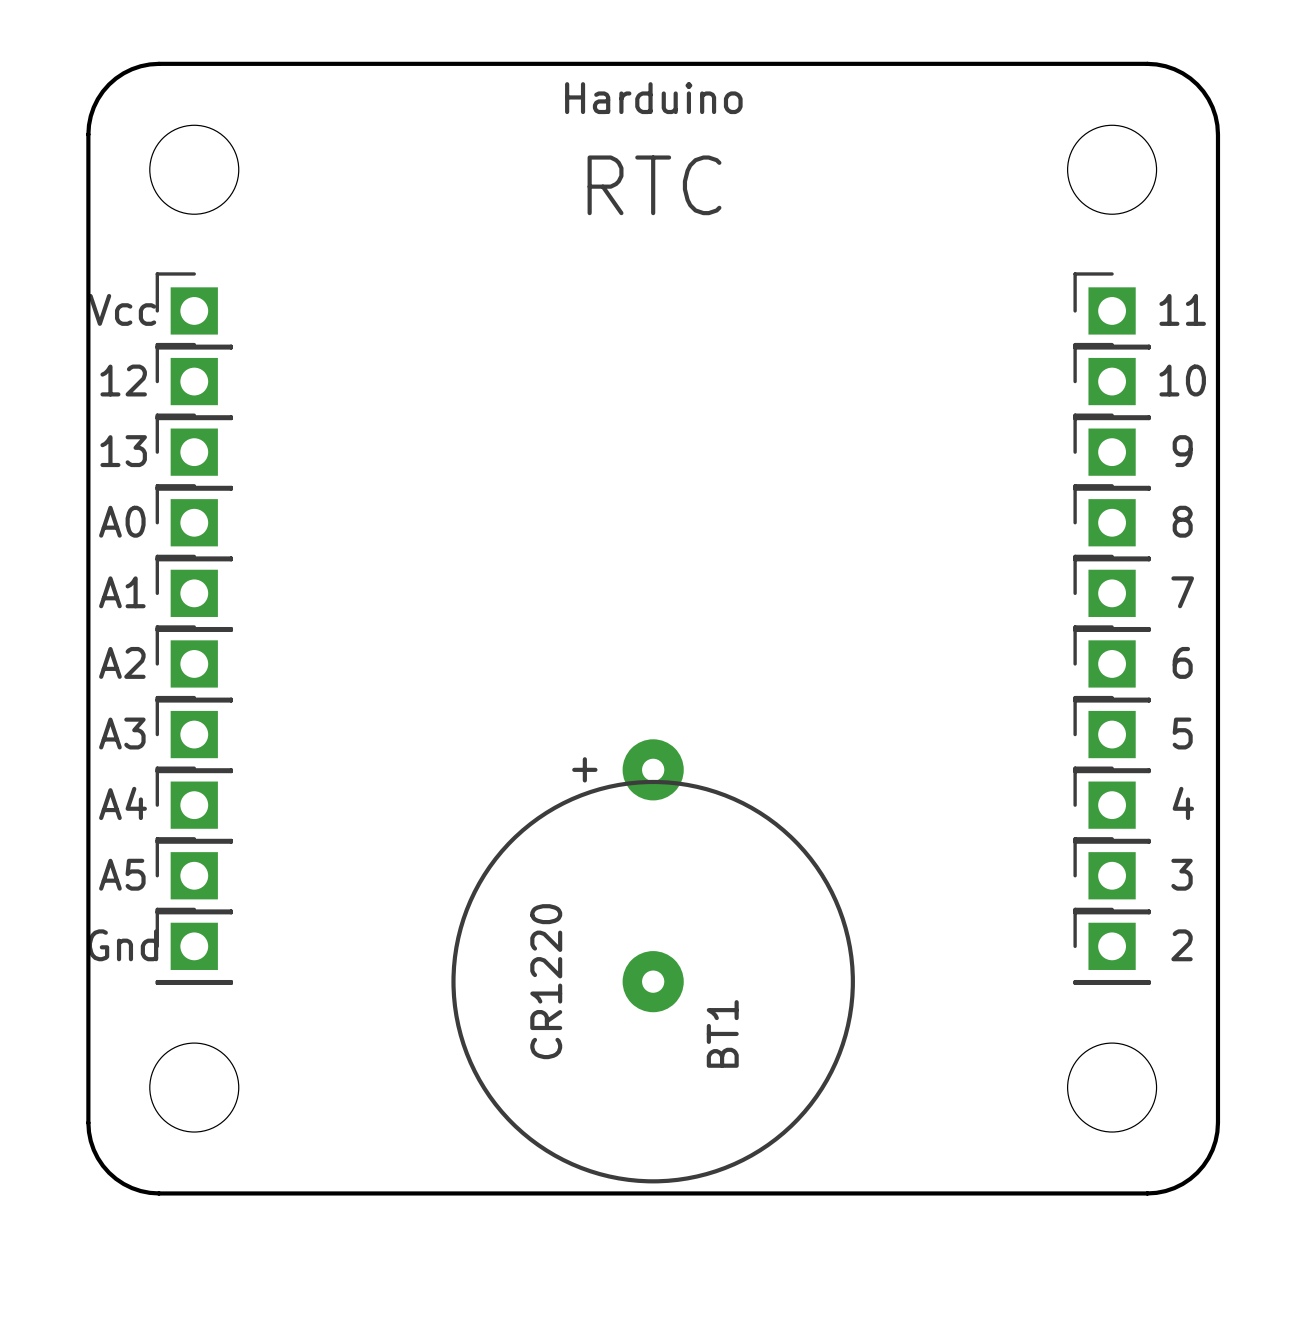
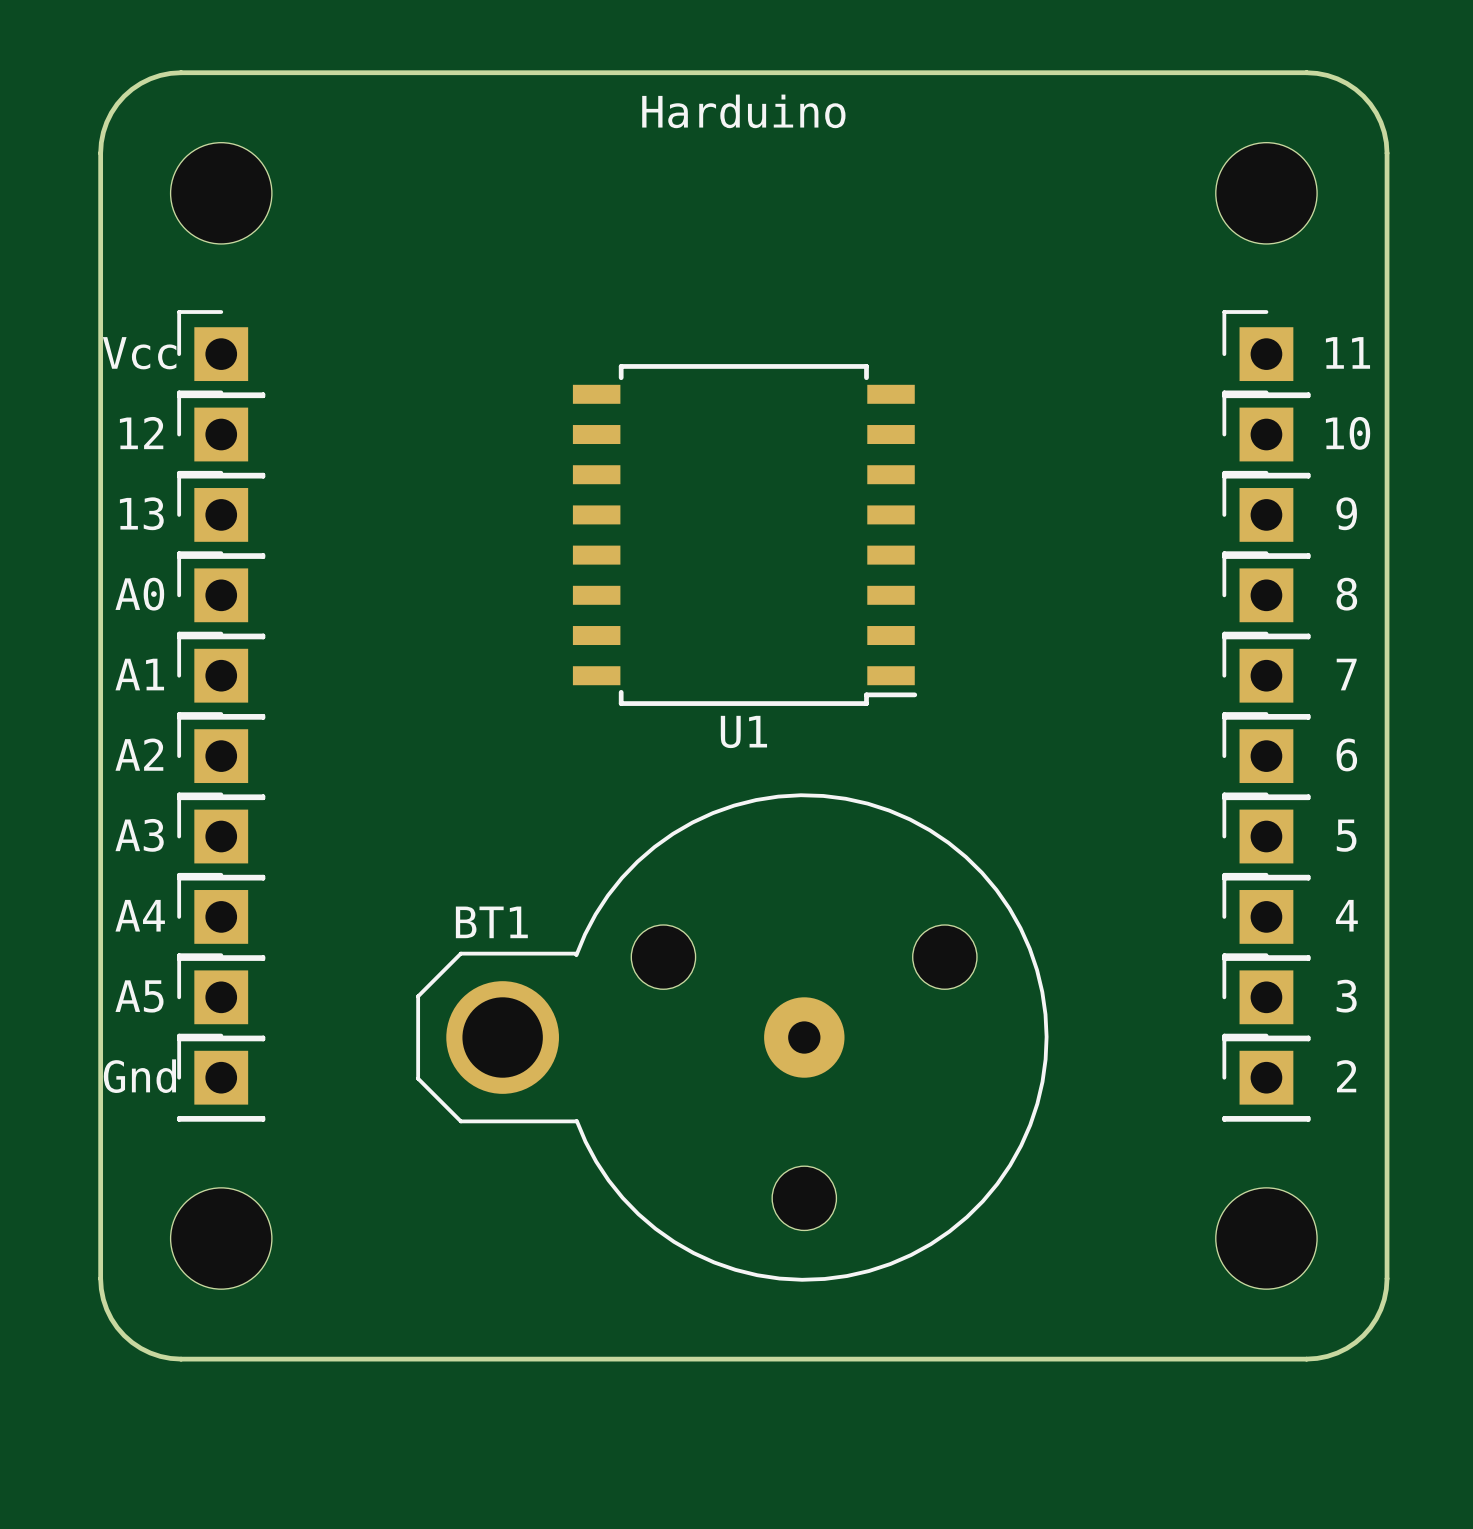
text: RTC (654, 185) -> none
U1: none -> (745, 535)
BT1 footprint: [451, 739, 855, 1184] -> [416, 793, 1049, 1282]
BT1 name position: BT1 (722, 1033) -> BT1 (491, 922)

